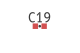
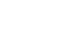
C19: (39, 26) -> none

